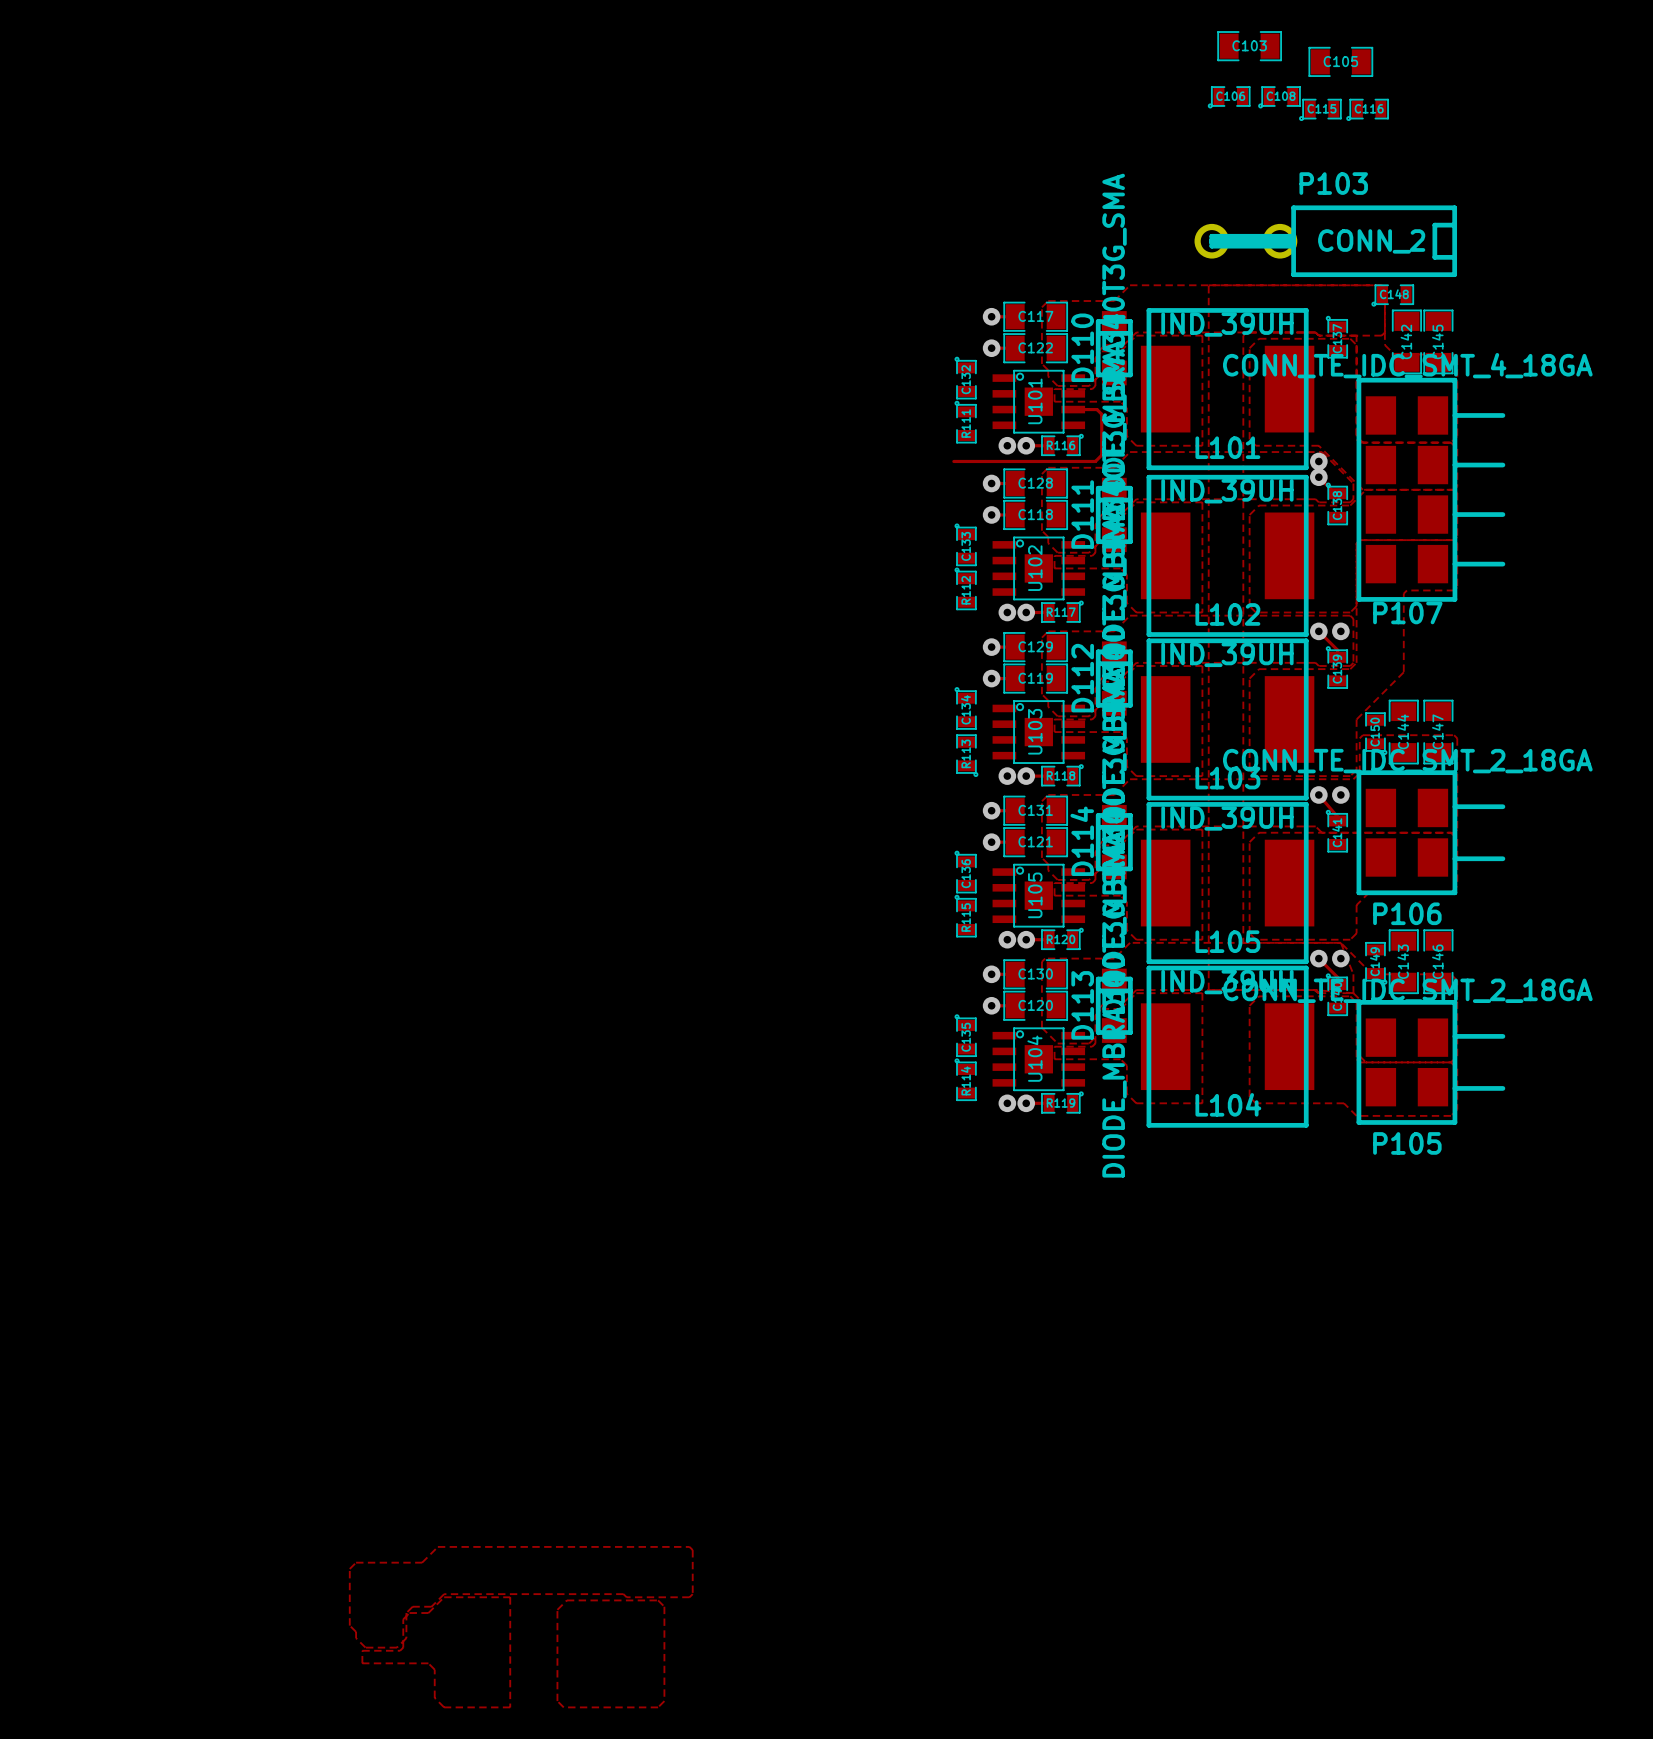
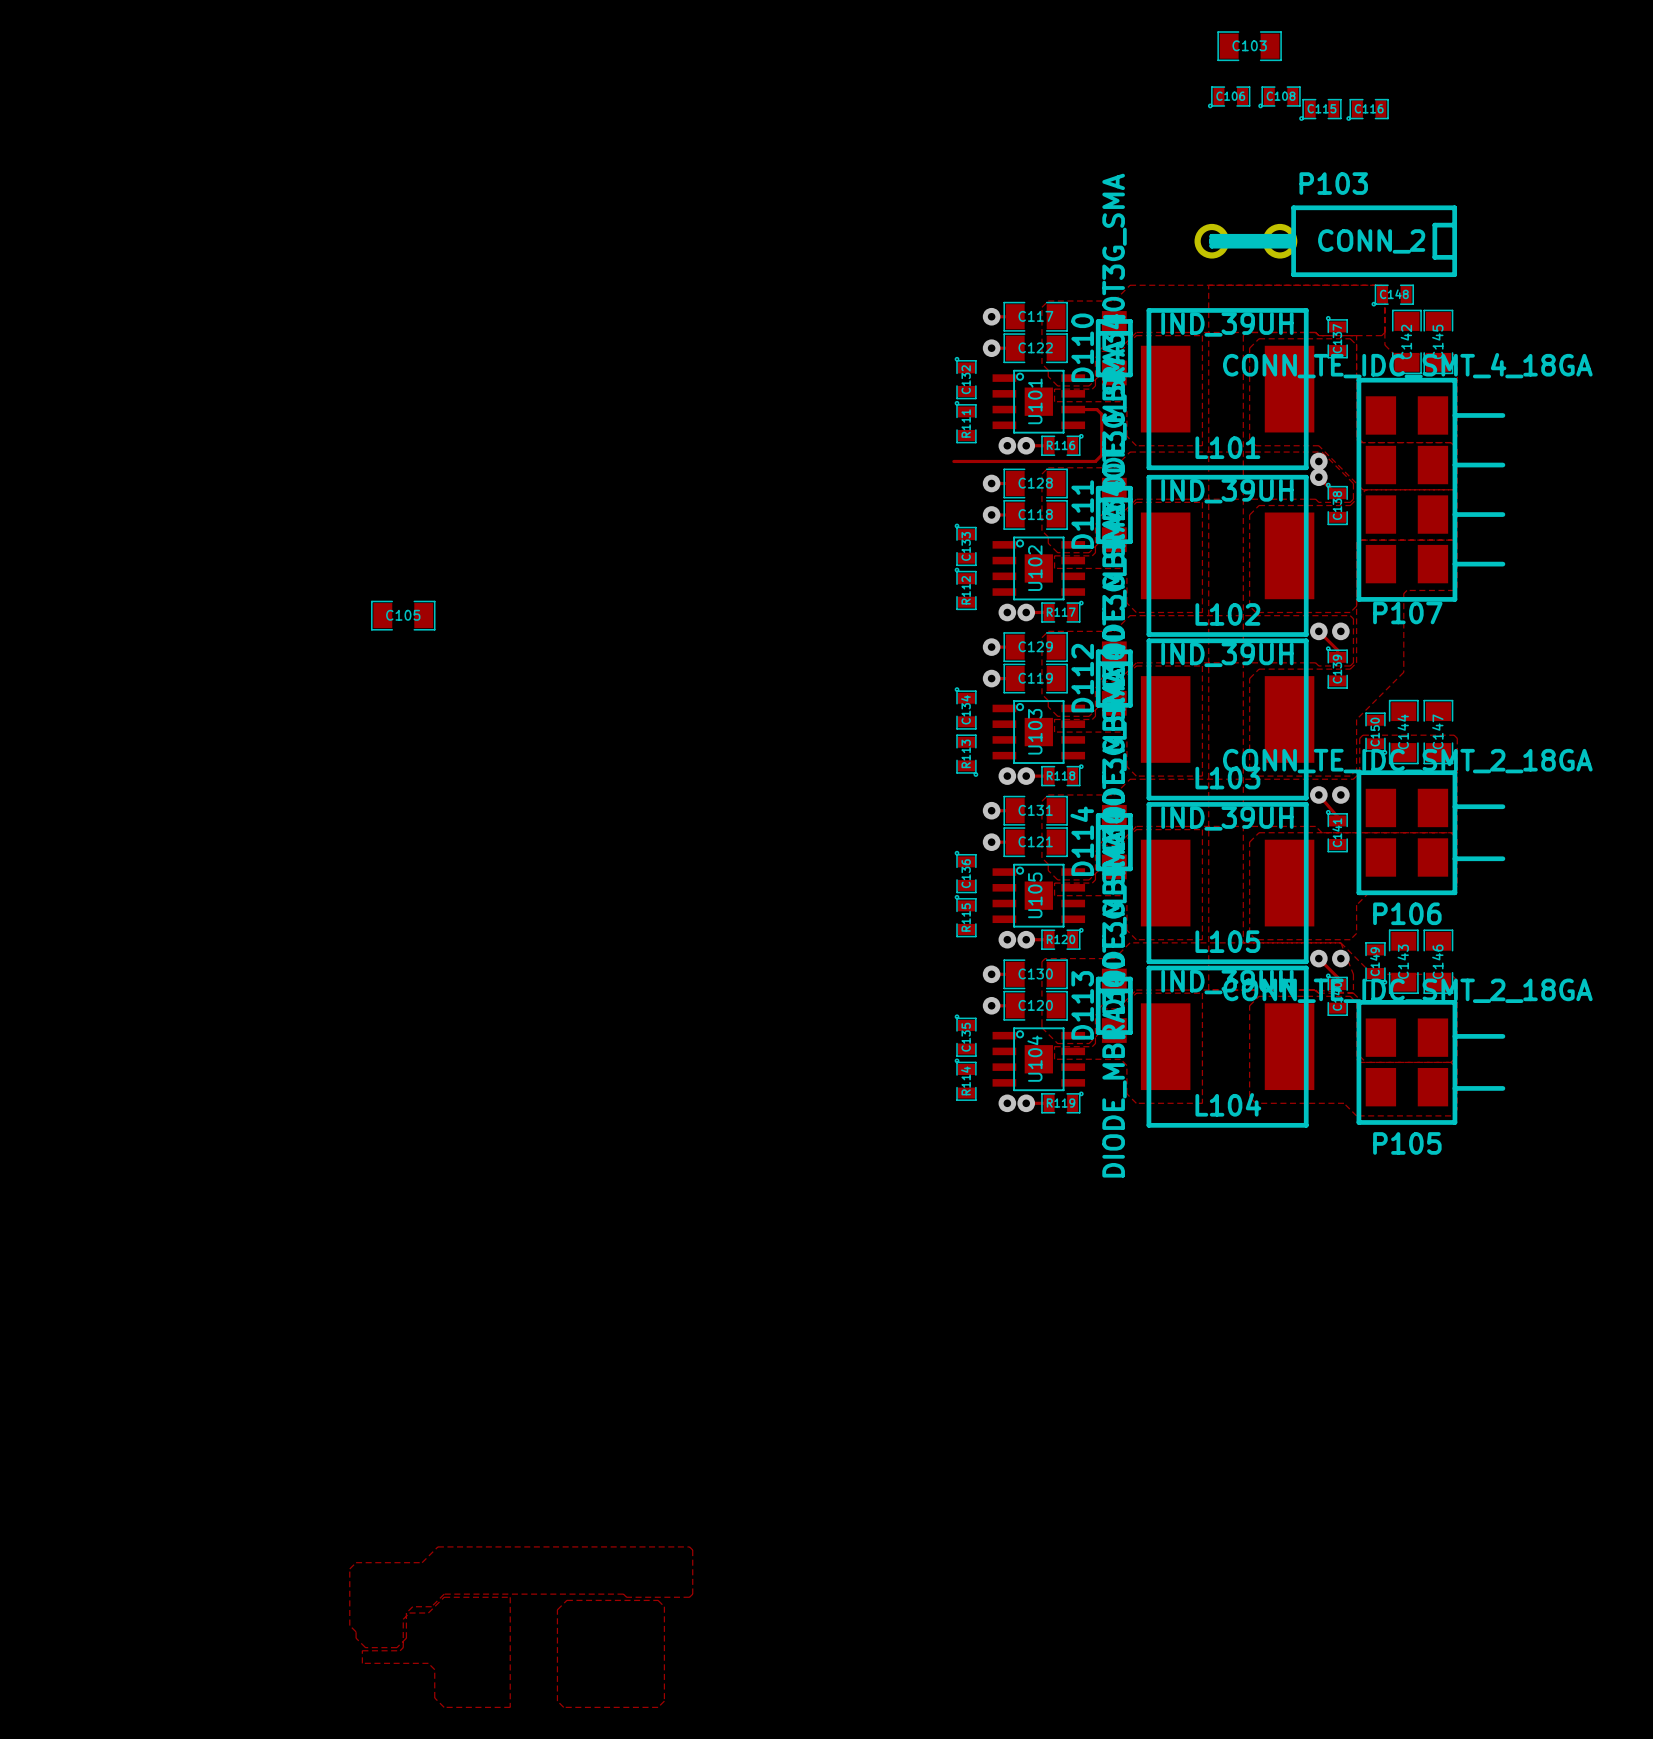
C105 position: (1340, 61) -> (403, 615)

